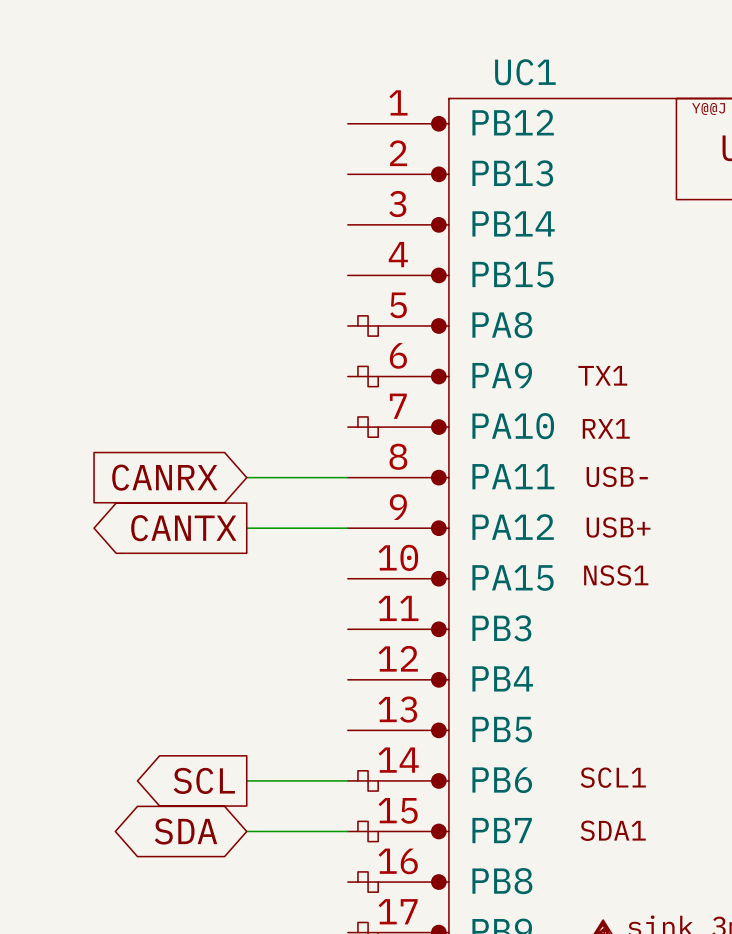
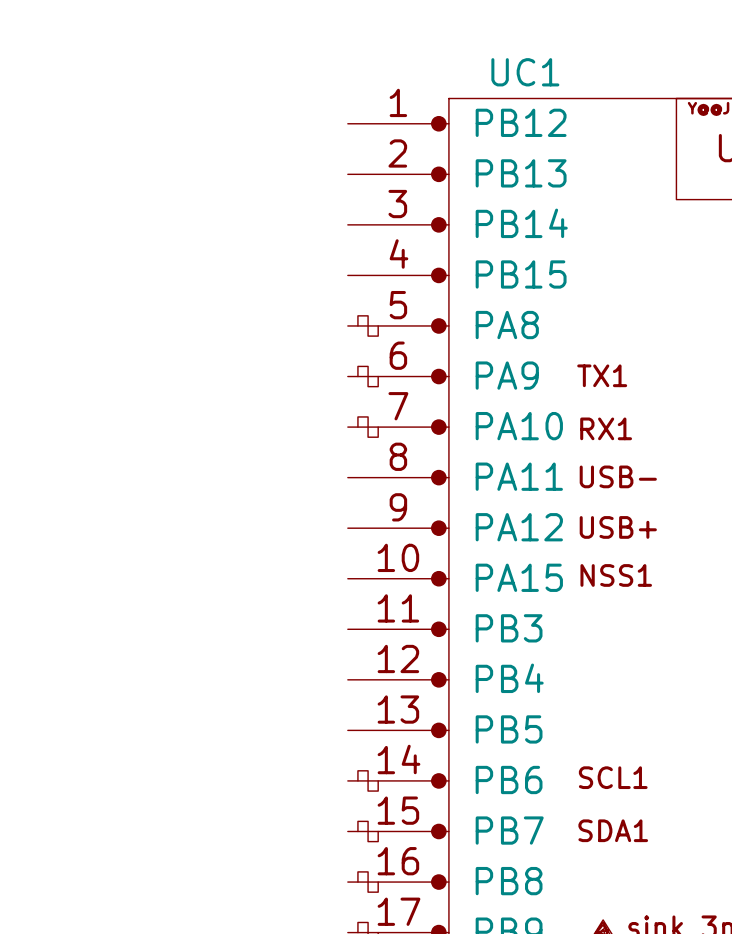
global label: CANRX (164, 477) -> none
wire: (246, 477) (347, 477) -> none
global label: CANTX (183, 528) -> none
wire: (246, 528) (347, 528) -> none
global label: SCL (204, 780) -> none
wire: (246, 780) (347, 780) -> none
global label: SDA (185, 831) -> none
wire: (246, 831) (347, 831) -> none

